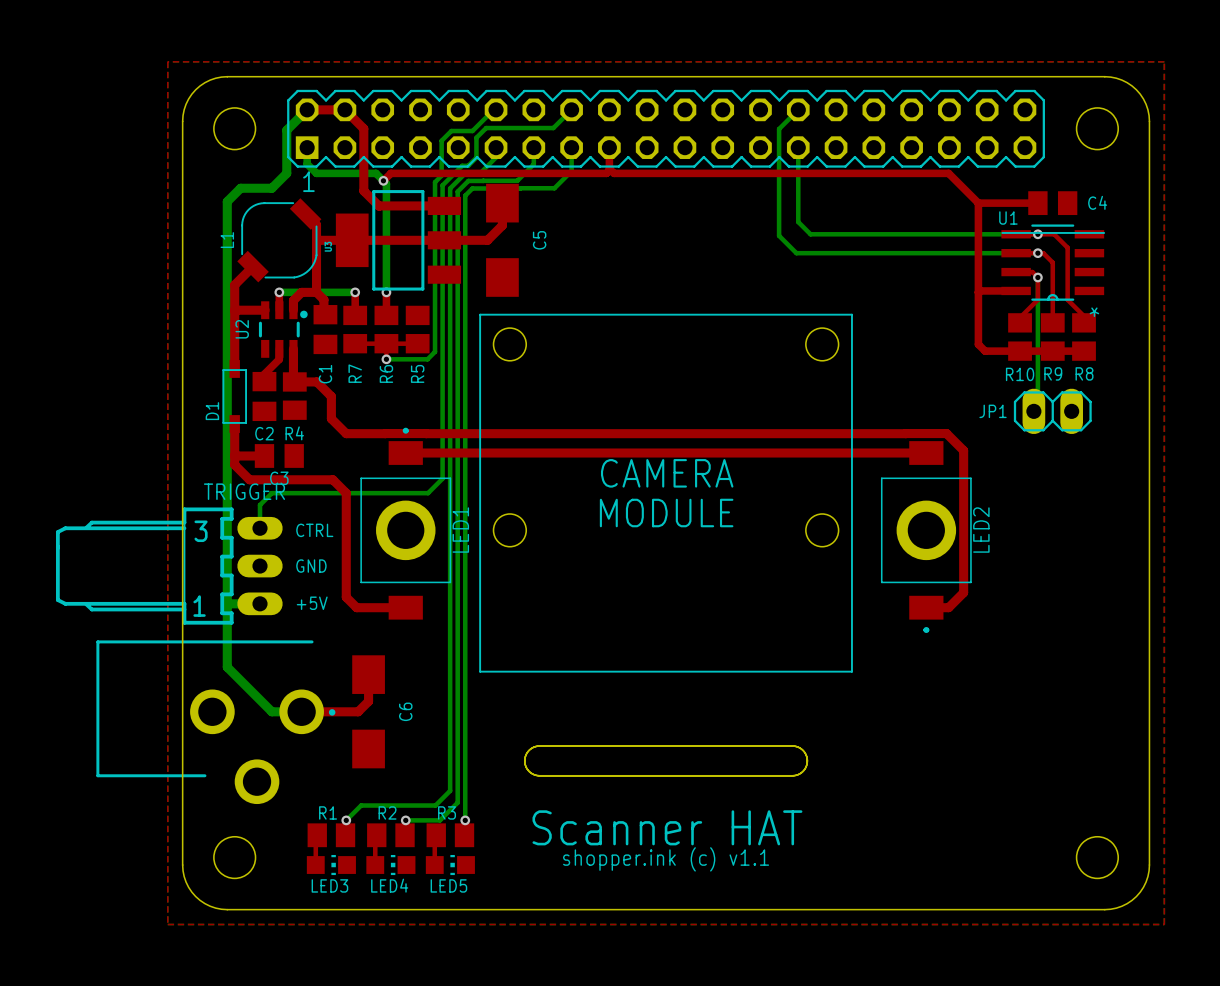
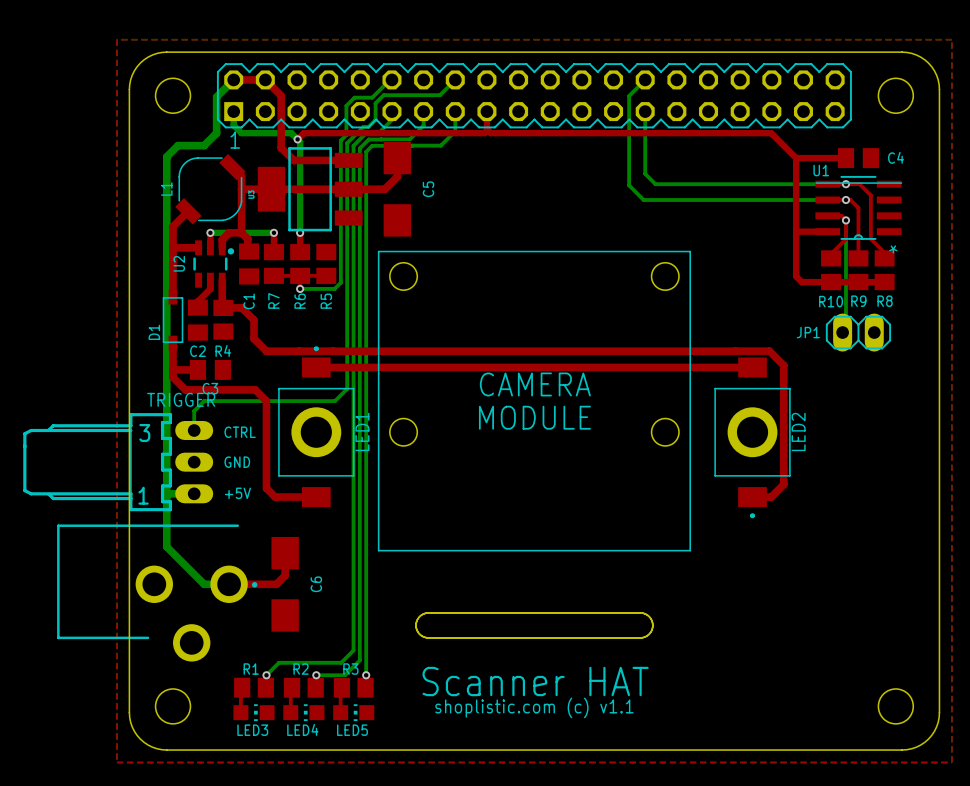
text: shopper.ink (c) v1.1 (666, 859) -> shoplistic.com (c) v1.1 (534, 707)

